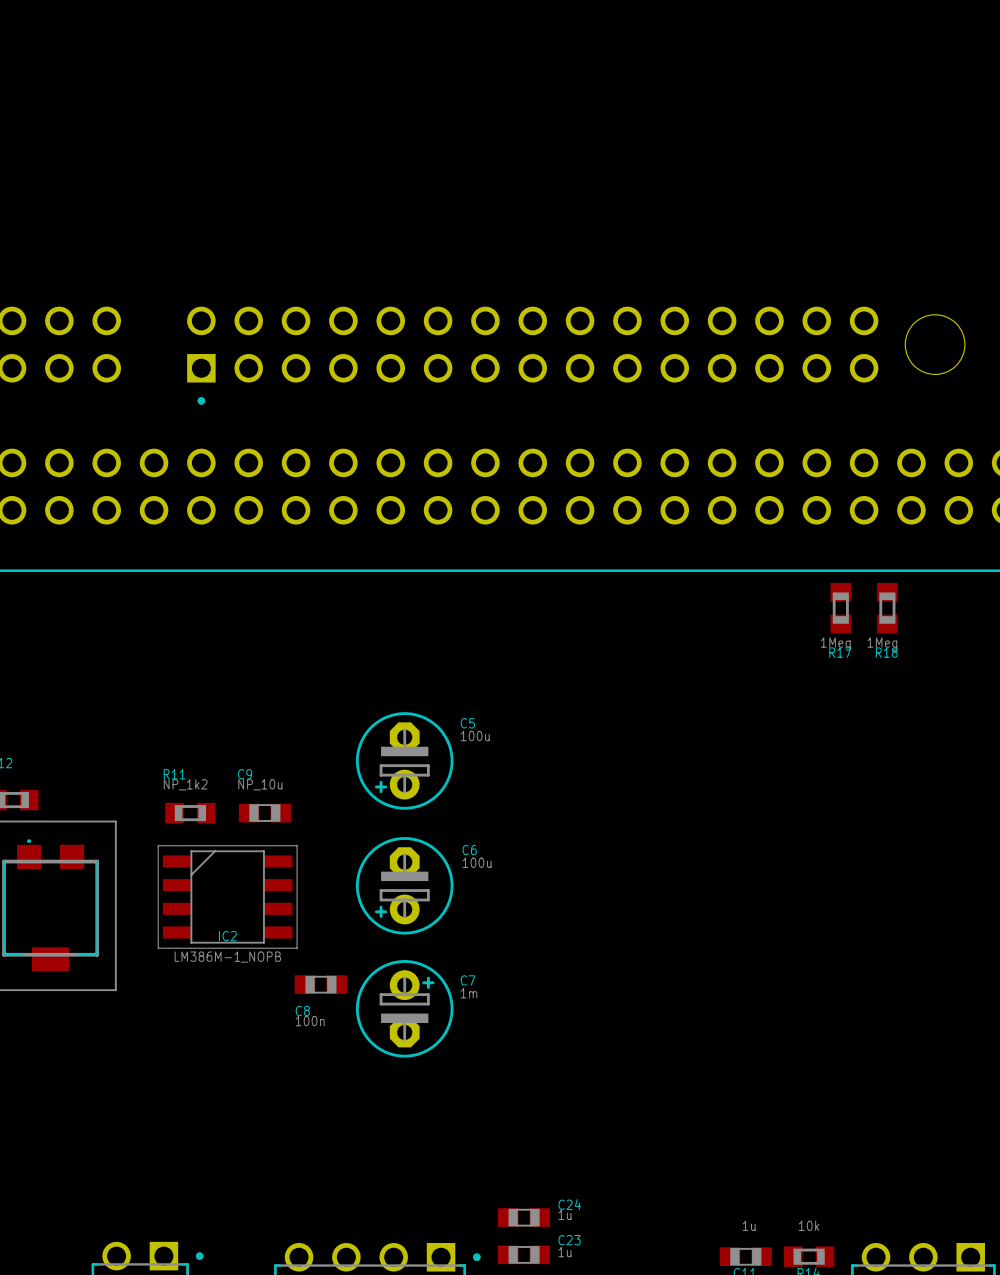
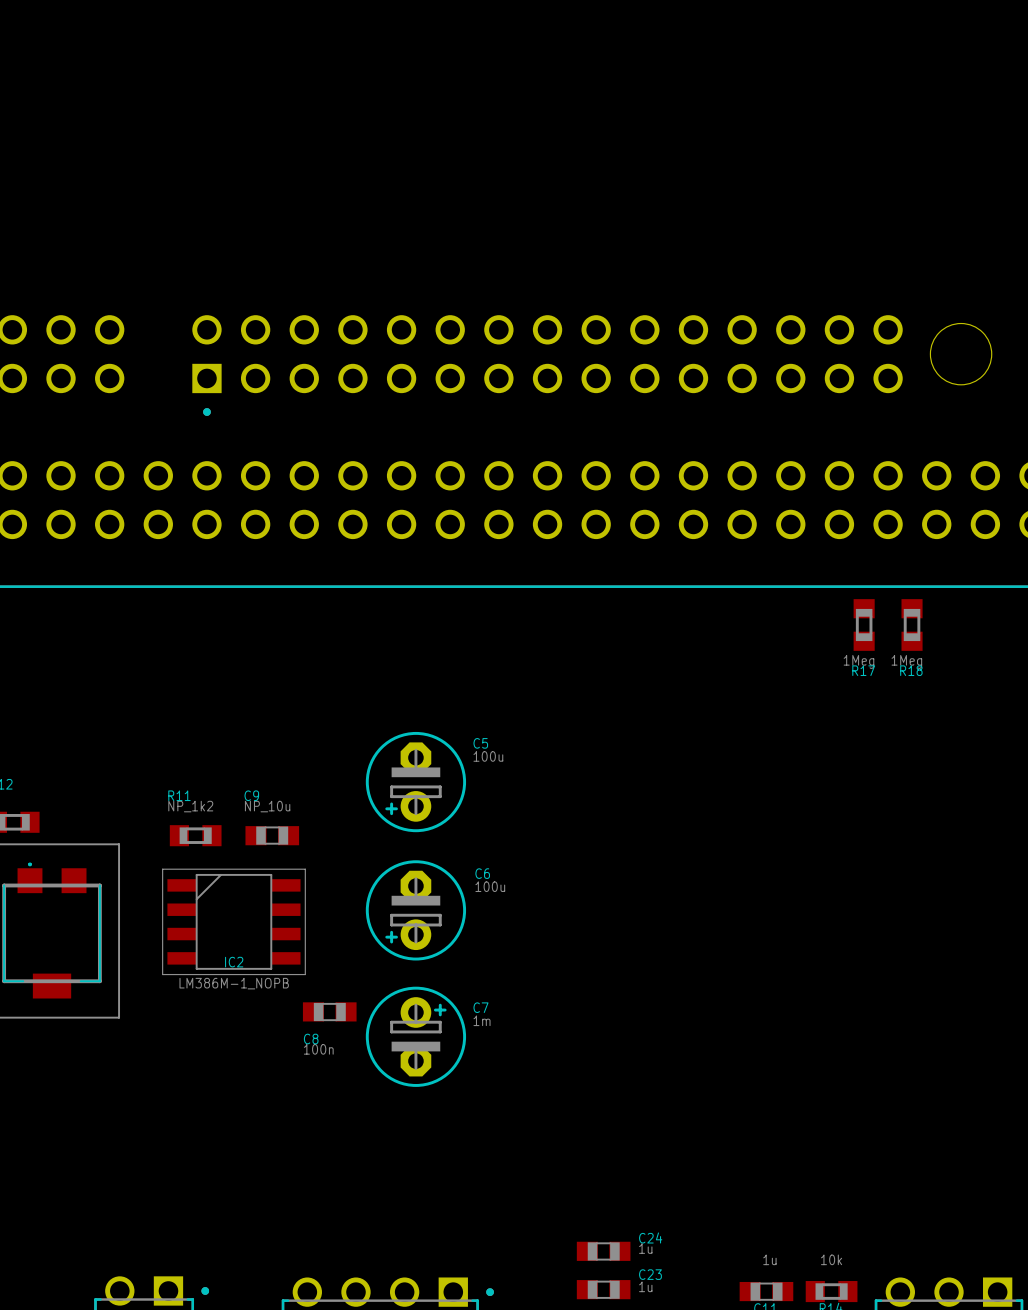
C24 position: (523, 1217) -> (603, 1251)
C23 position: (523, 1254) -> (603, 1289)

